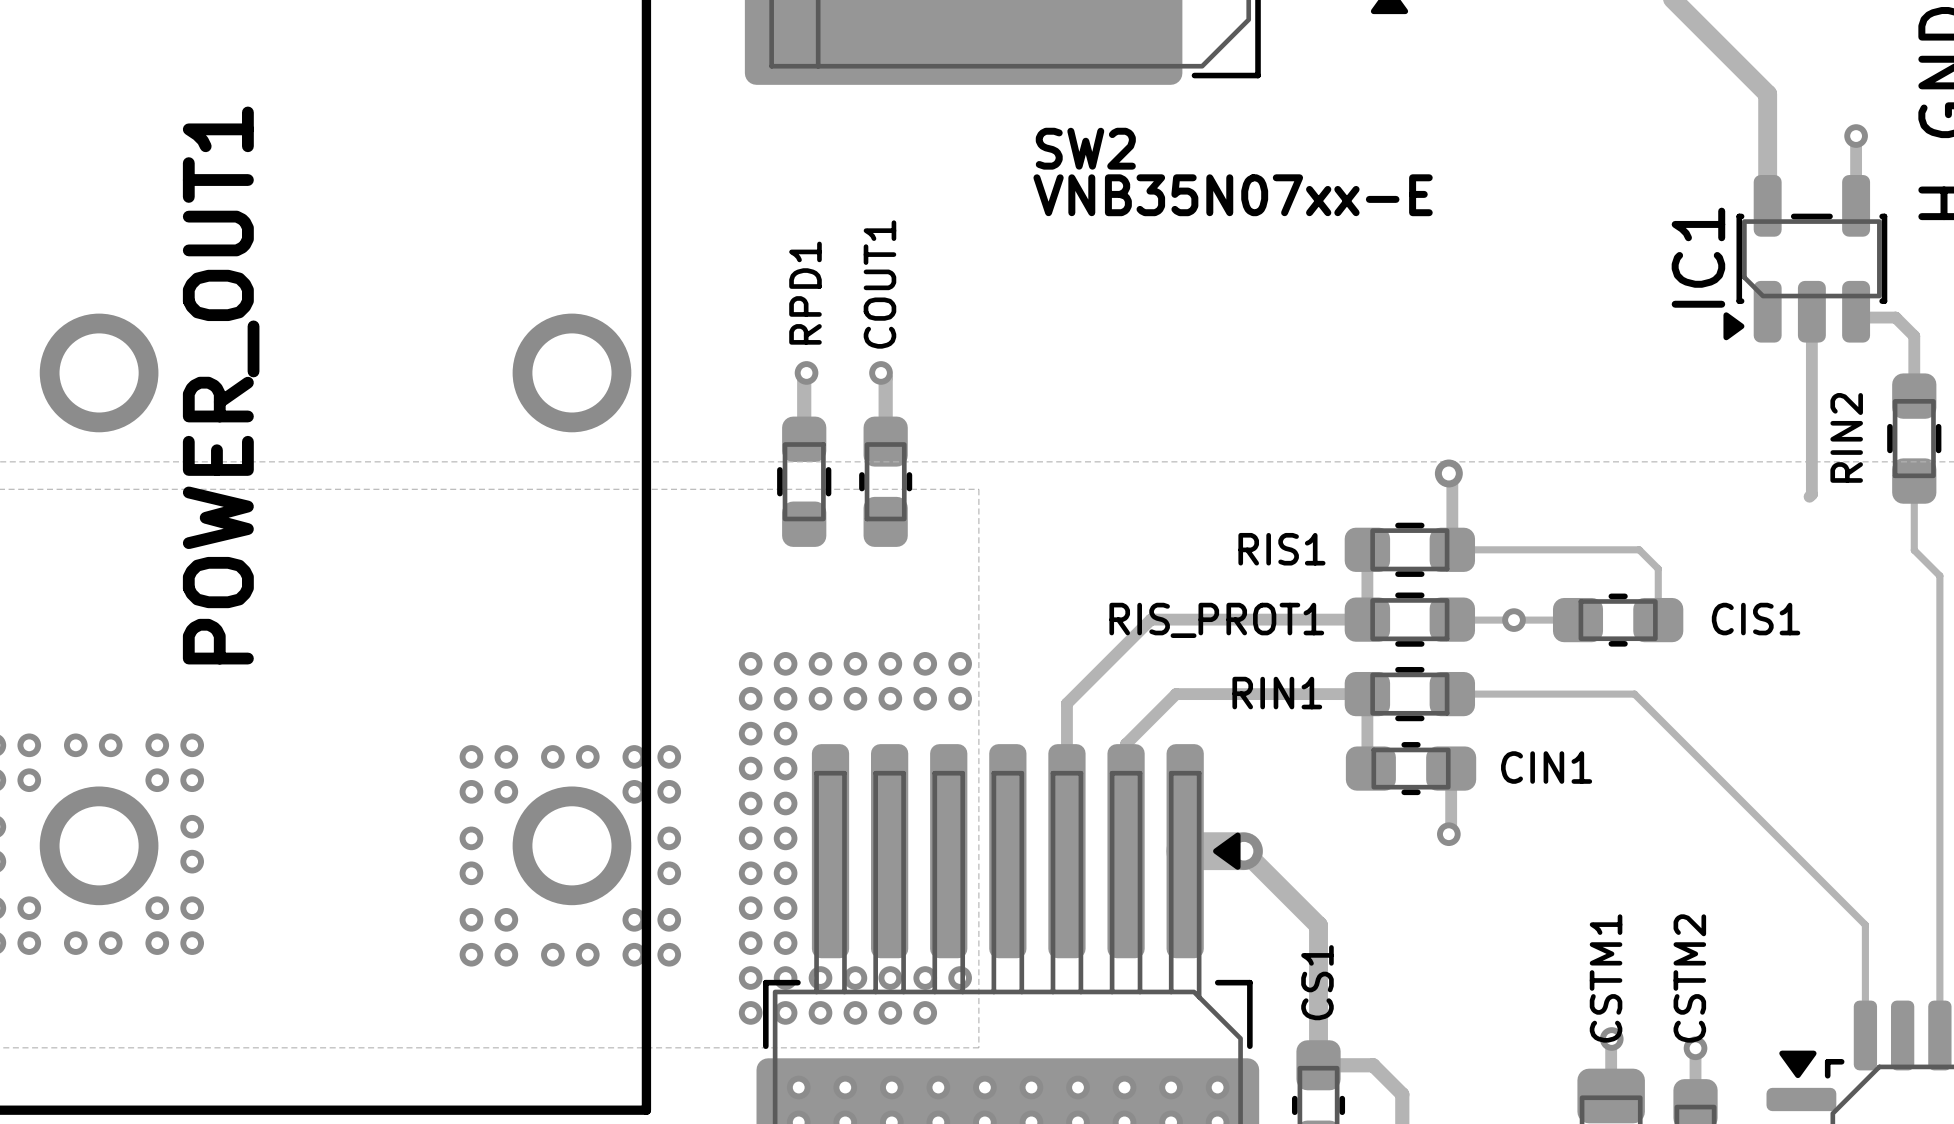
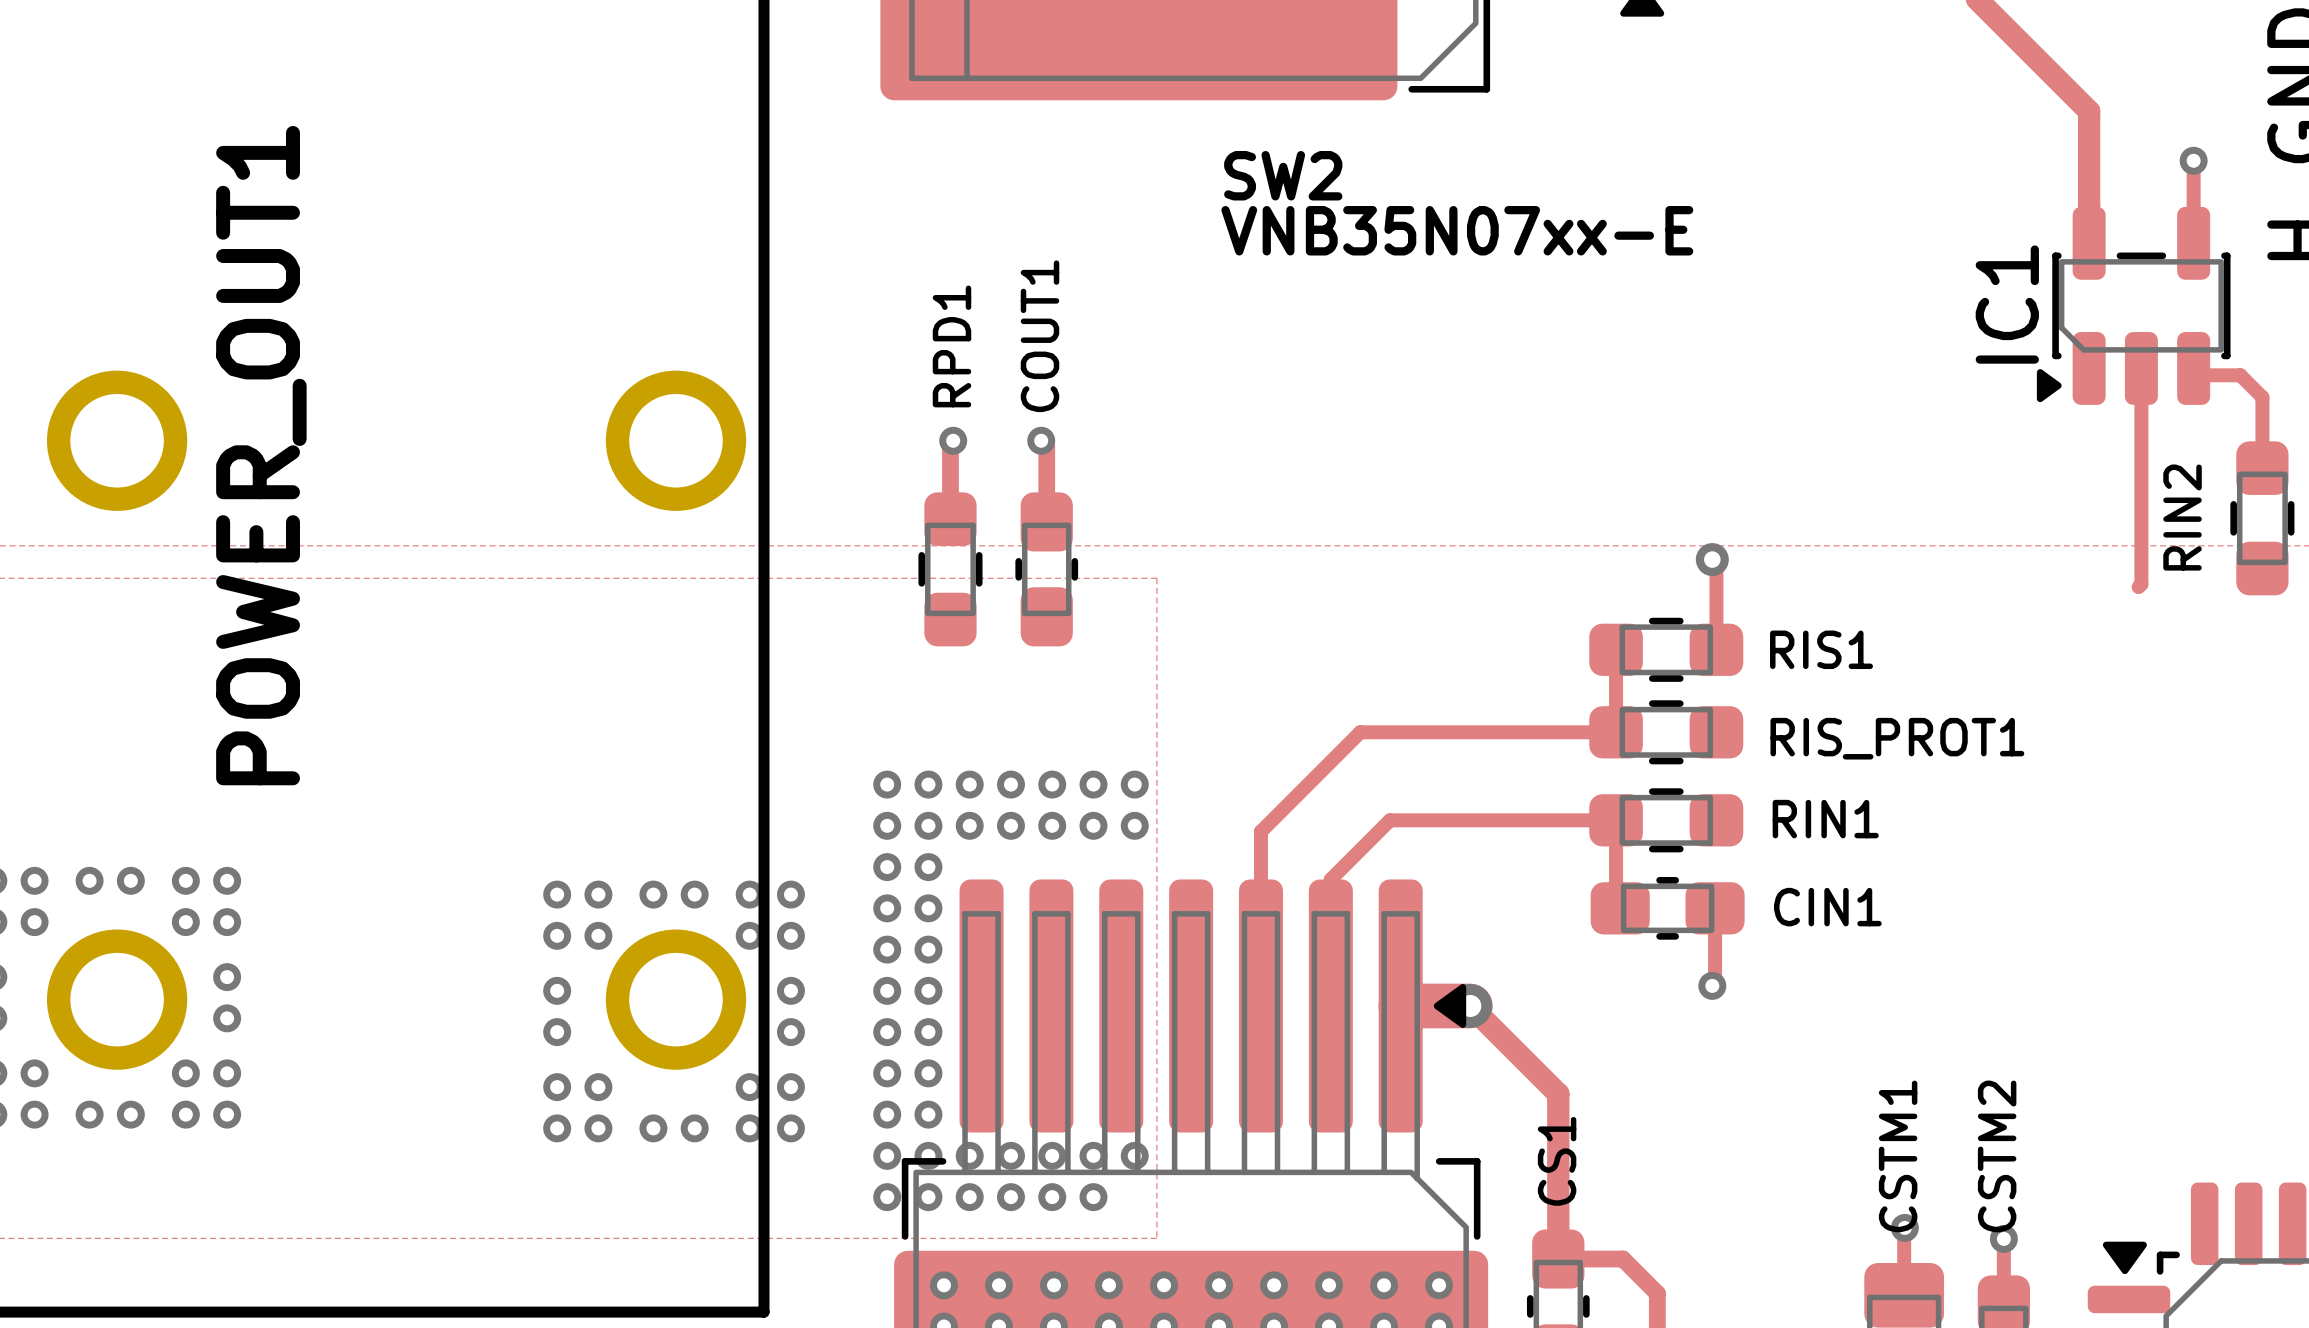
track: (1914, 481) (1914, 550) (1939, 575) (1939, 1035) -> none
RIS1 name position: RIS1 (1281, 549) -> RIS1 (1821, 649)
track: (1452, 549) (1639, 549) (1658, 568) (1658, 620) -> none
RIS_PROT1 name position: RIS_PROT1 (1216, 620) -> RIS_PROT1 (1897, 738)
track: (1452, 620) (1578, 620) -> none
via: (1514, 620) -> none
CIS1: (1618, 620) -> none
RIN1 name position: RIN1 (1277, 693) -> RIN1 (1825, 819)
track: (1452, 694) (1634, 694) (1865, 924) (1865, 1035) -> none

